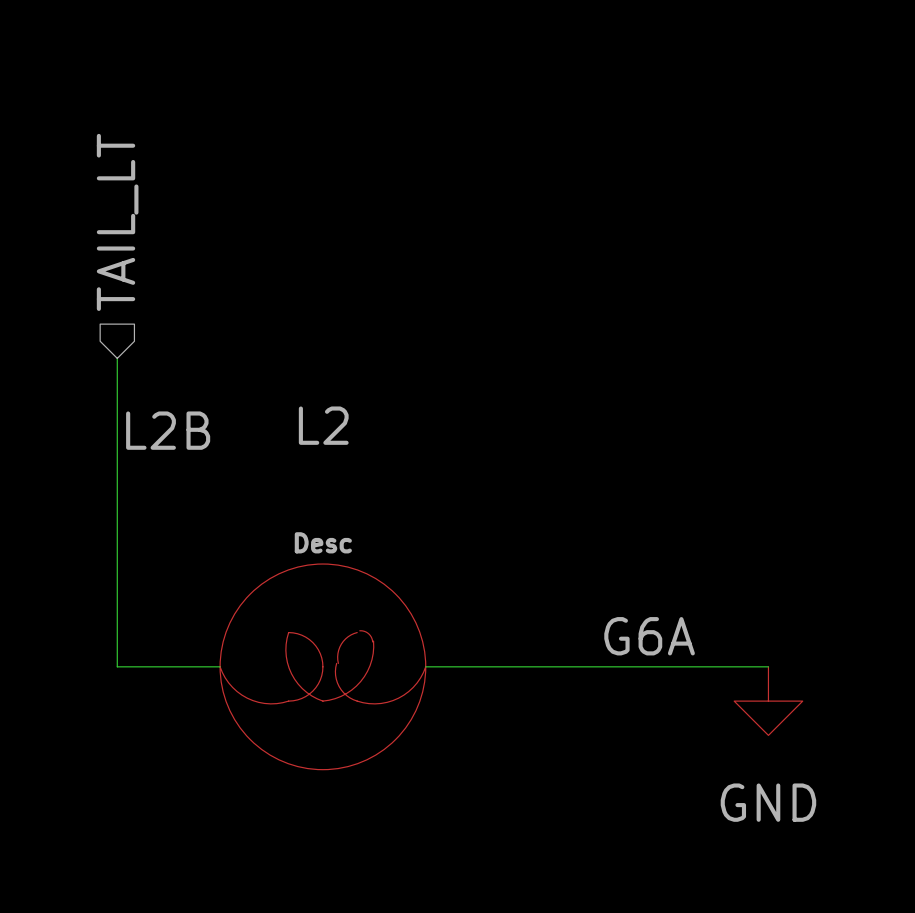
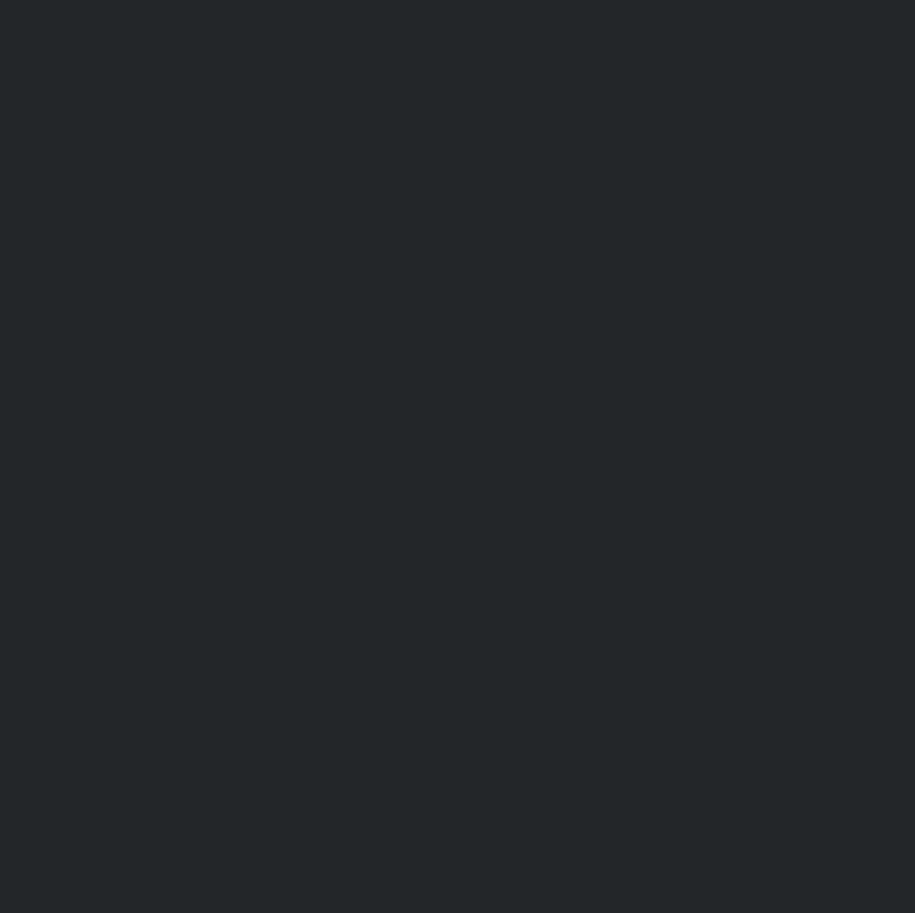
hierarchical label: TAIL_LT (117, 222) -> none
wire: (117, 358) (117, 666) (220, 666) -> none
label: L2B (168, 430) -> none
label: G6A (649, 636) -> none
L2: (322, 666) -> none
wire: (425, 666) (768, 666) -> none
power symbol: GND (768, 701) -> none

